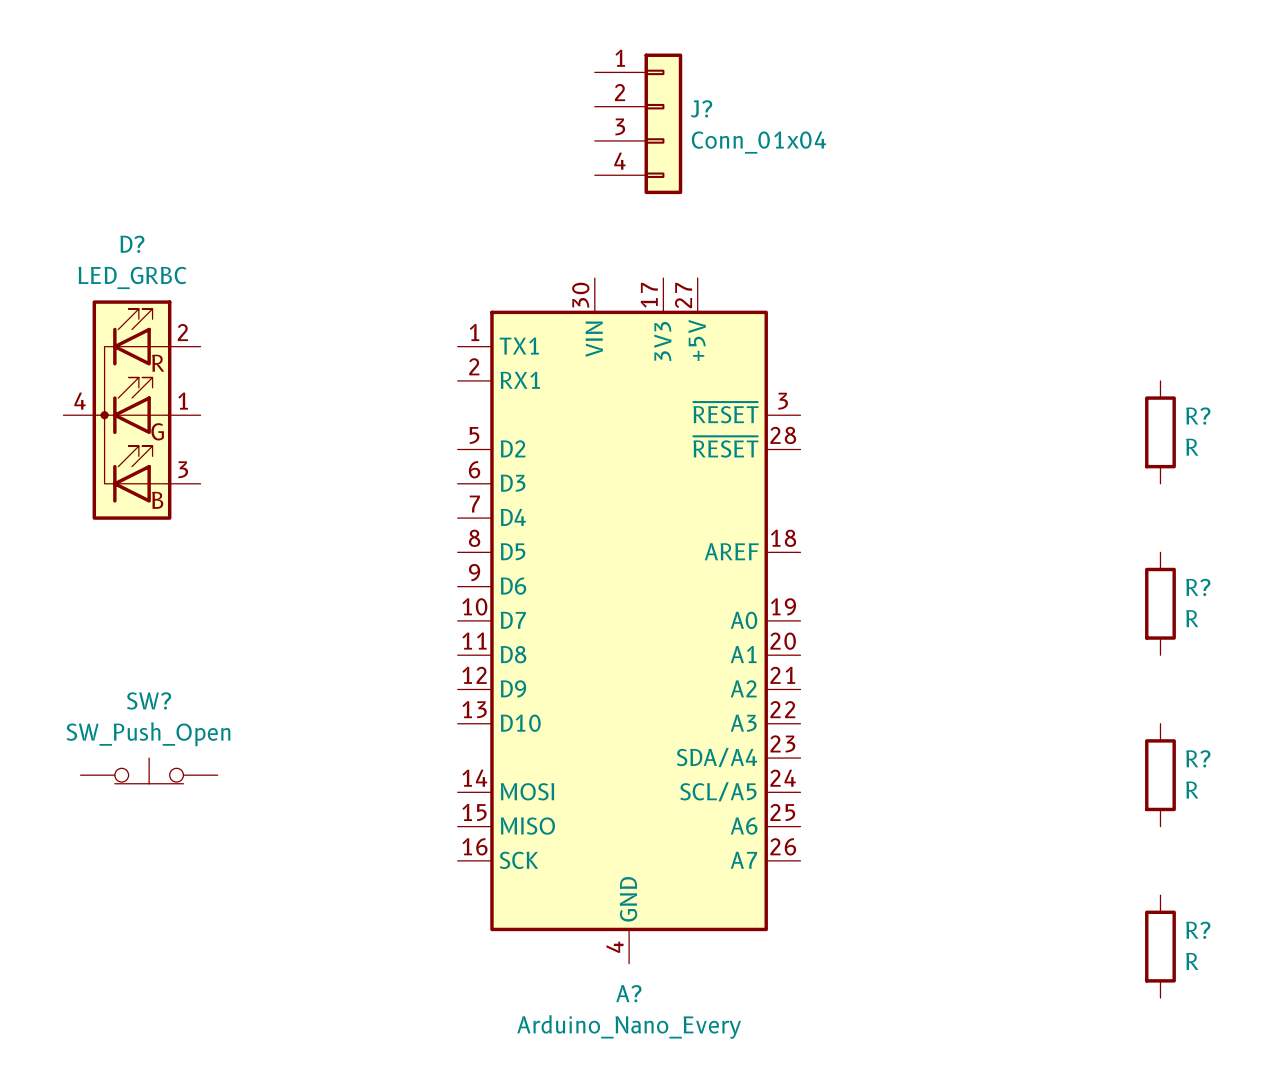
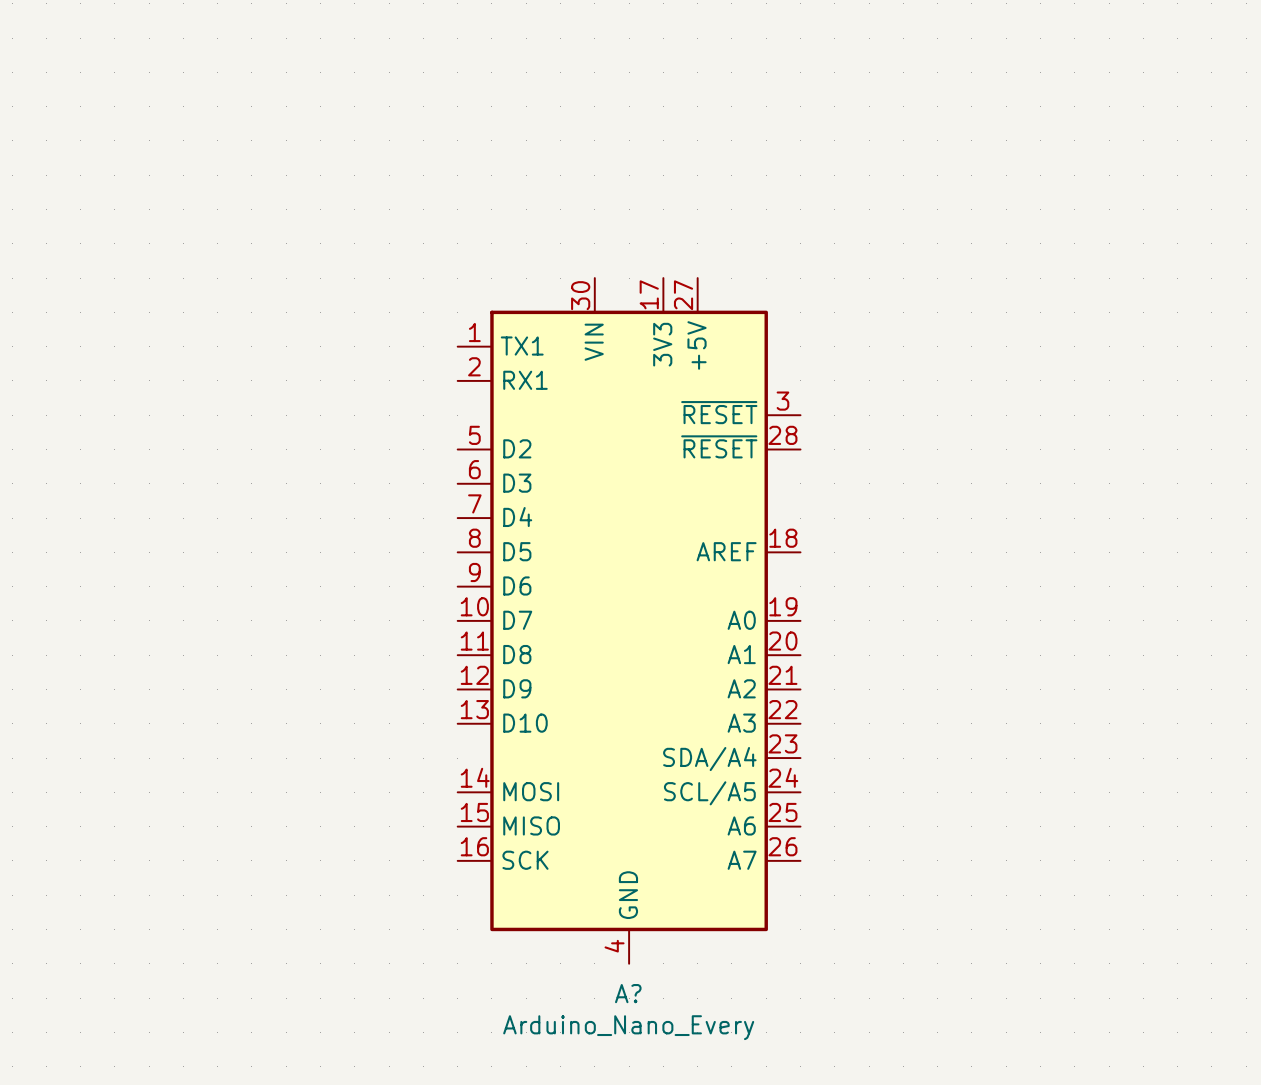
J?: Conn_01x04 (638, 123) -> none
D?: LED_GRBC (132, 410) -> none
R?: R (1160, 432) -> none
R?: R (1160, 603) -> none
SW?: SW_Push_Open (149, 770) -> none
R?: R (1160, 775) -> none
R?: R (1160, 946) -> none

